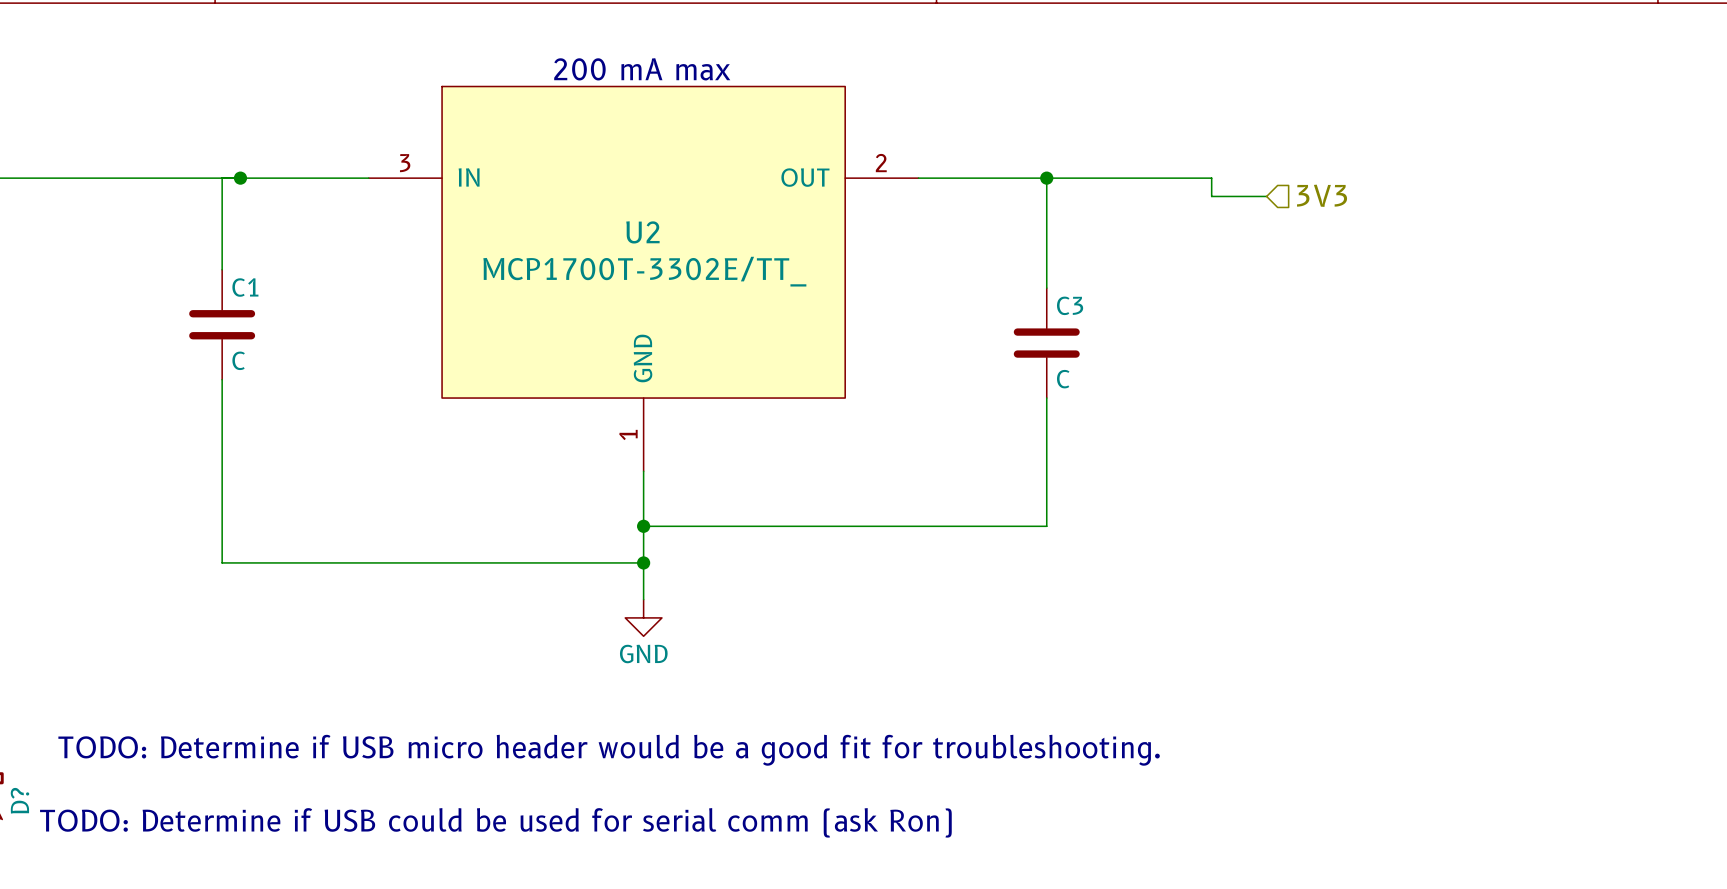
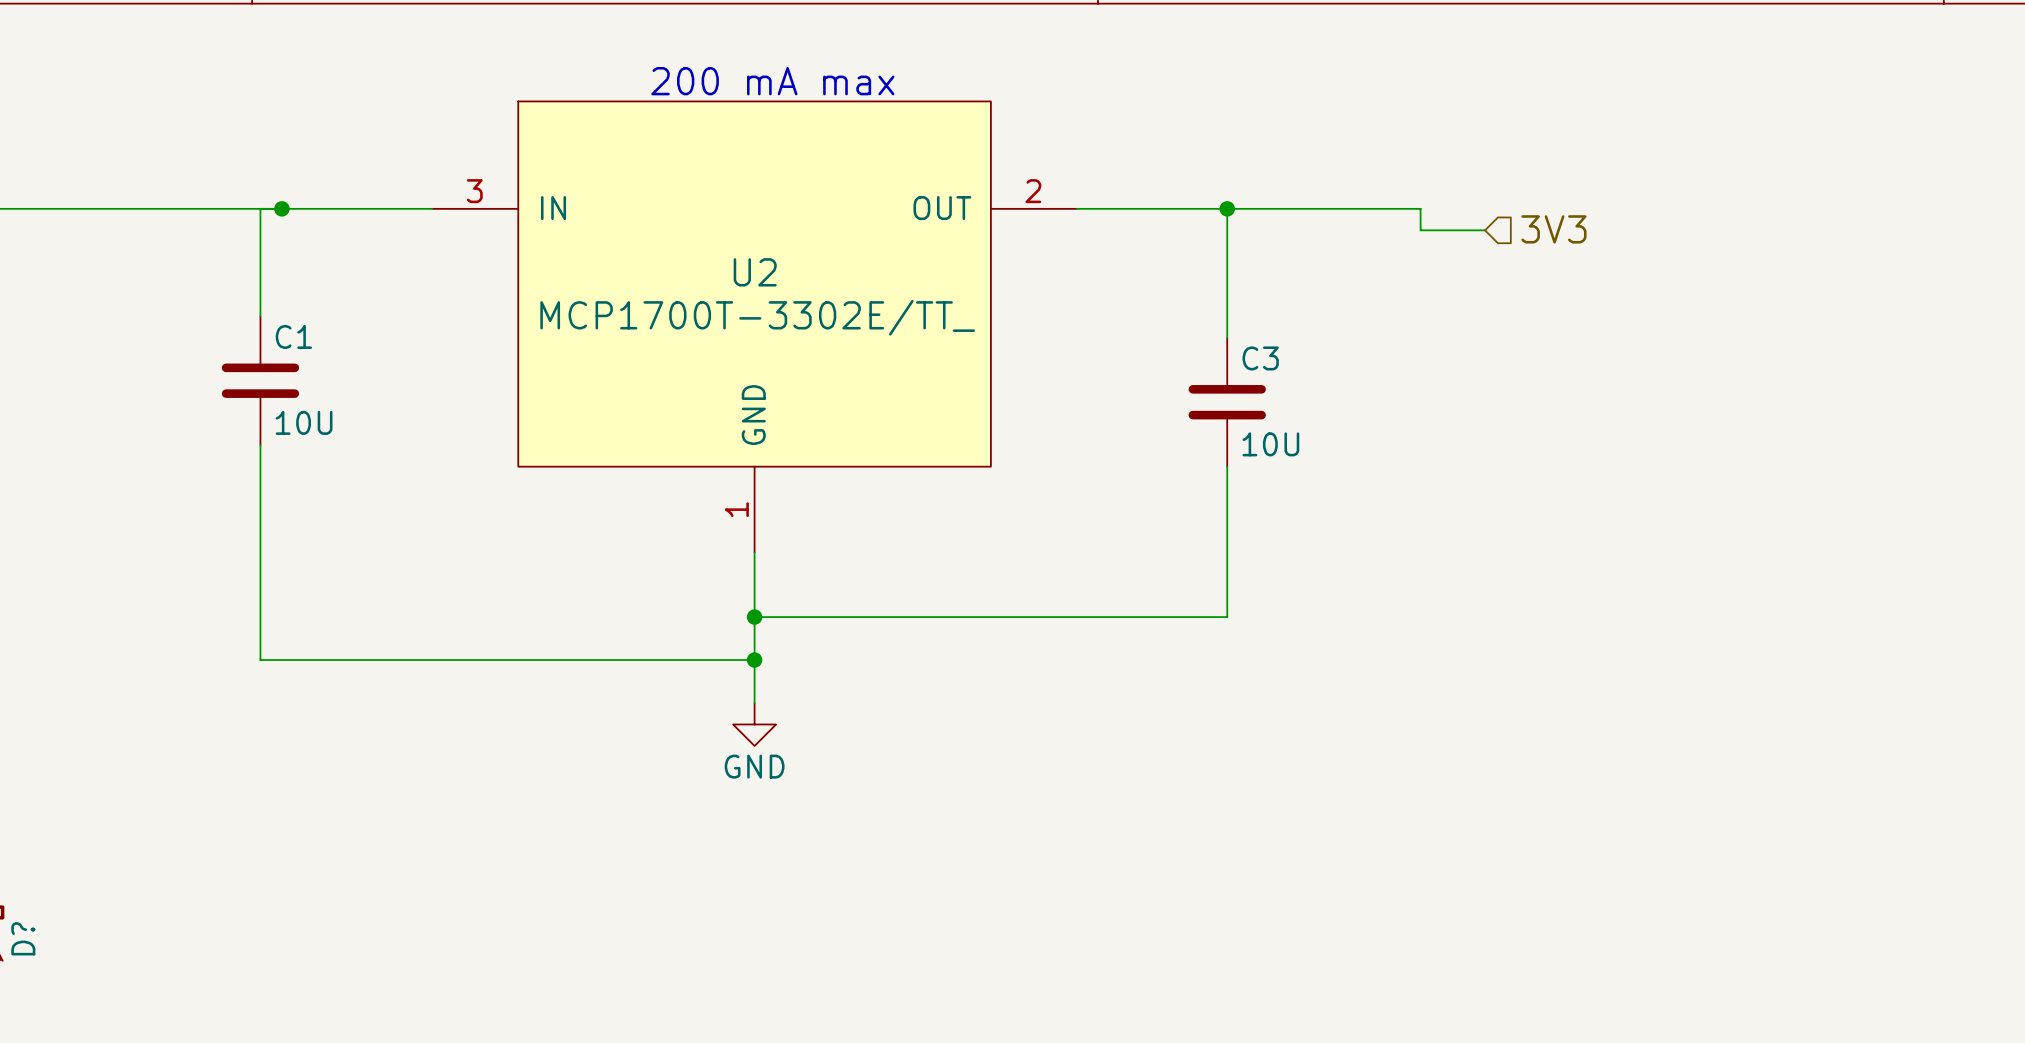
C1 value: C (238, 360) -> 10U (304, 422)
C3 value: C (1063, 379) -> 10U (1270, 444)
text: TODO: Determine if USB micro header would be a good fit for troubleshooting. (609, 750) -> none
text: TODO: Determine if USB could be used for serial comm (ask Ron) (495, 822) -> none

